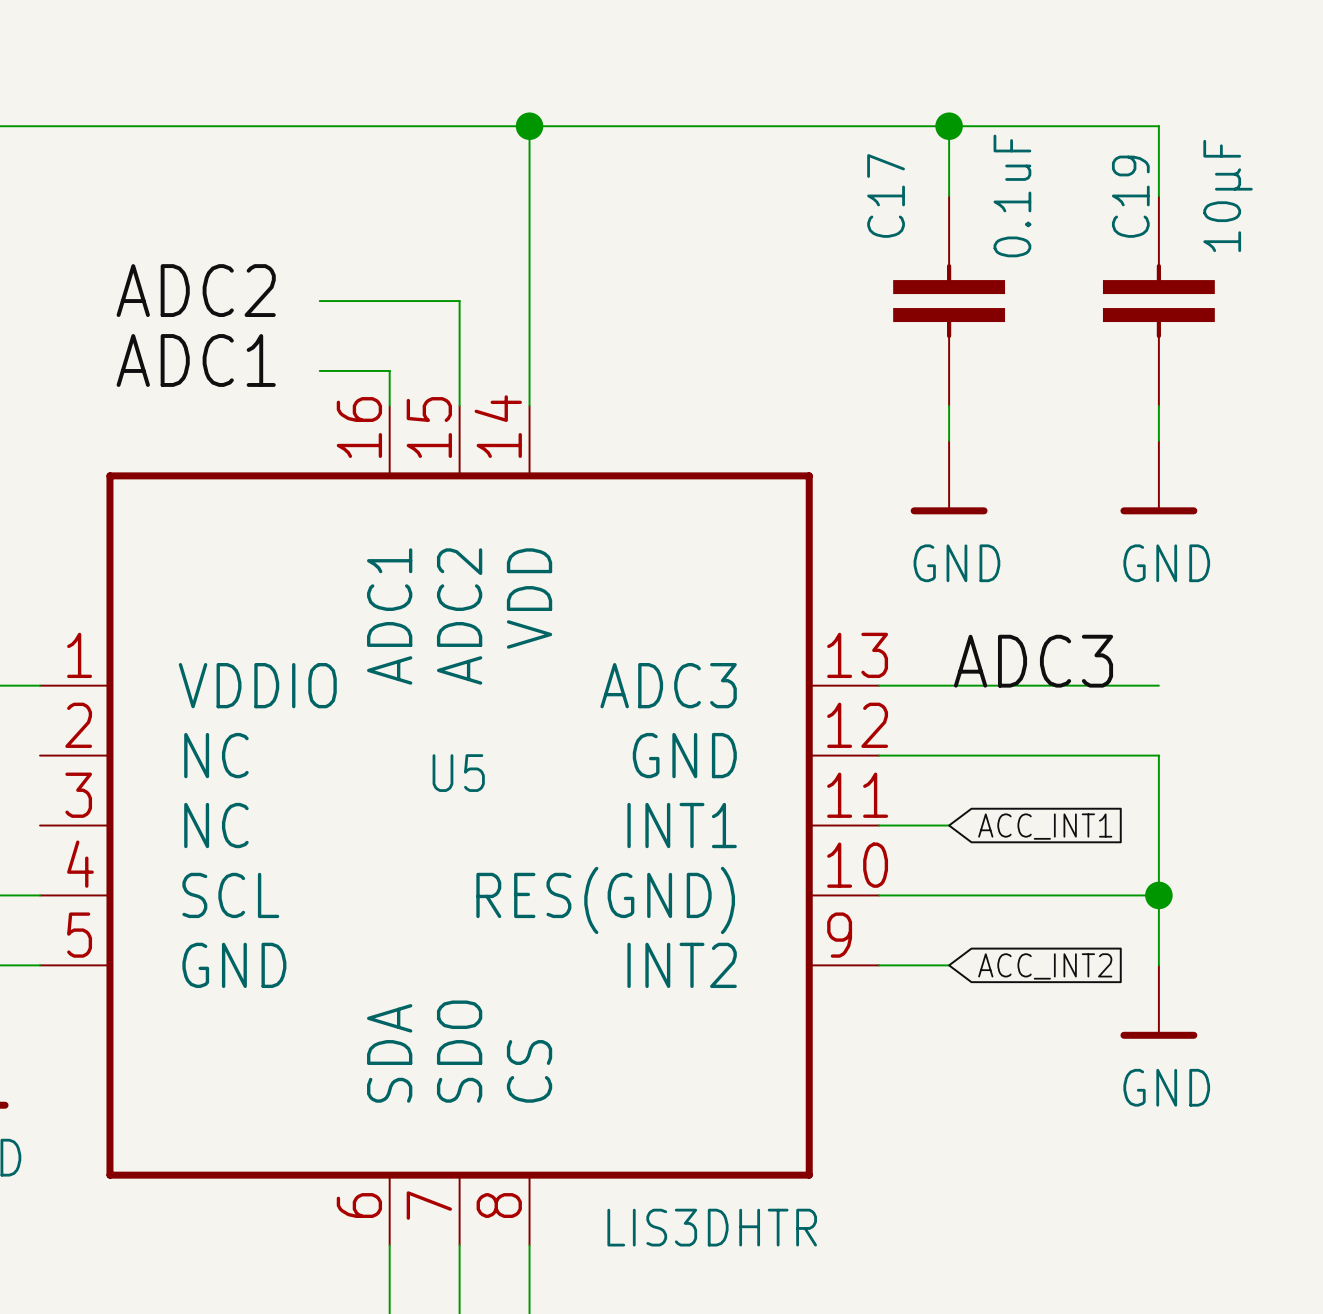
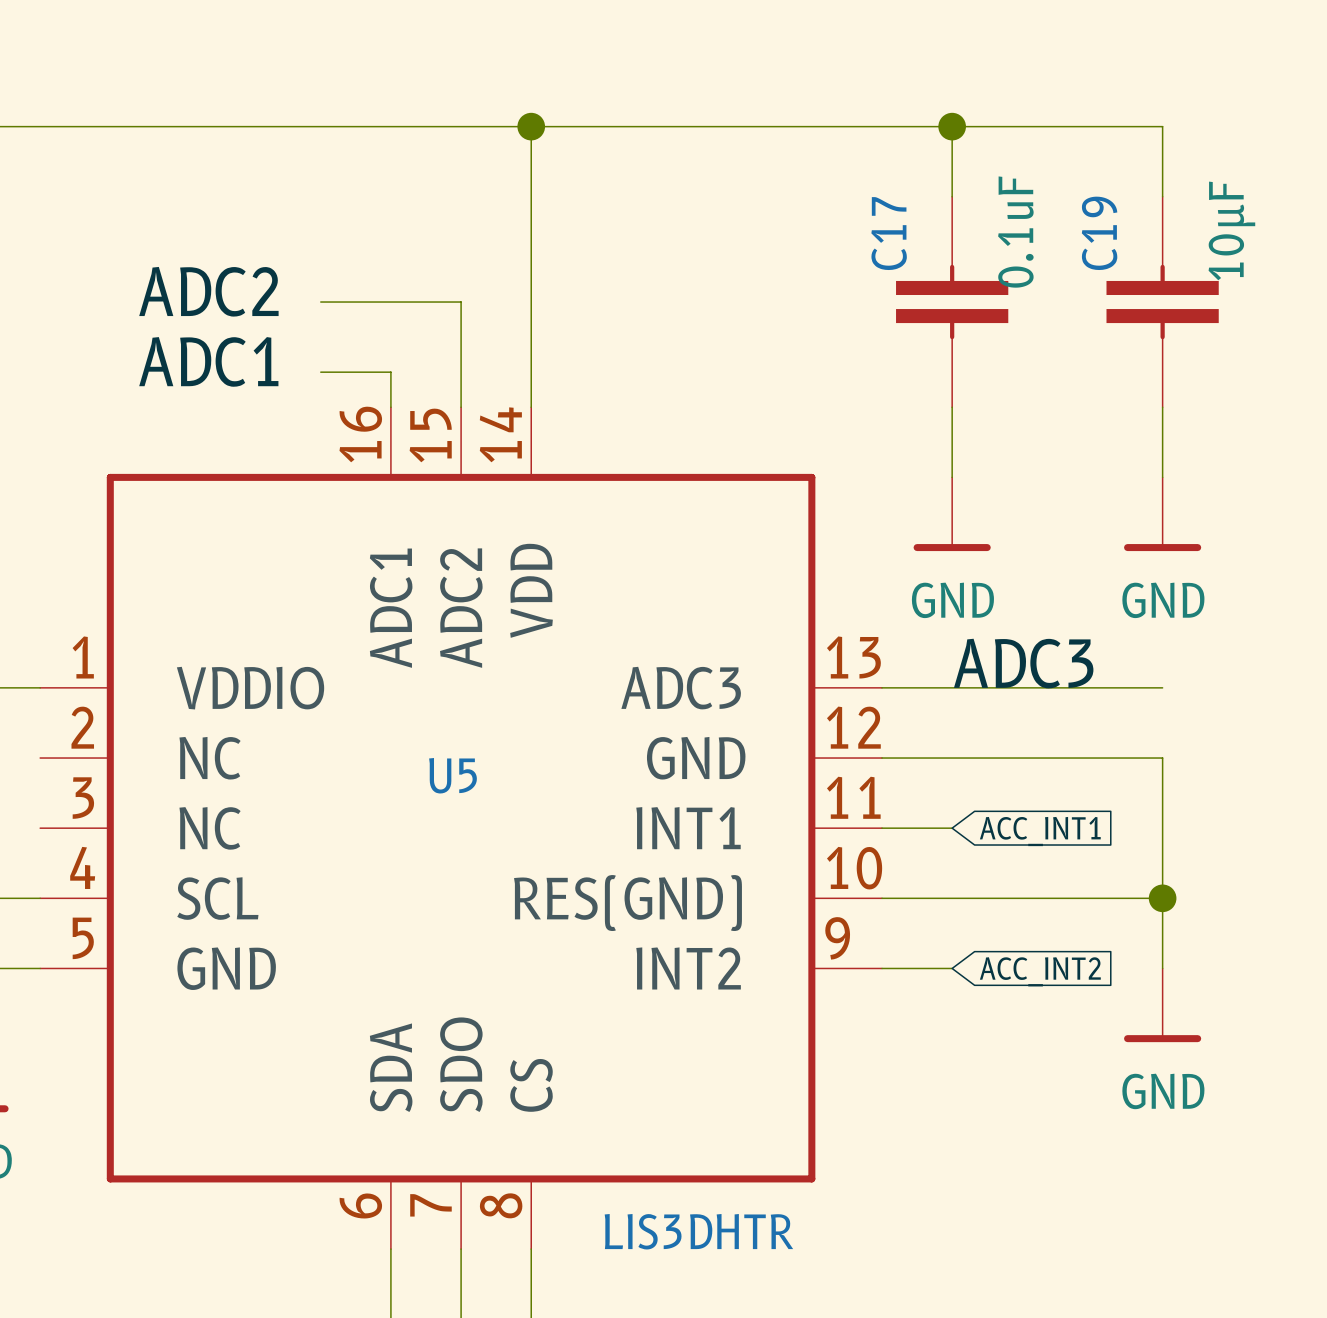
C17 name position: C17 (886, 195) -> C17 (889, 233)
C17 value position: 0.1uF (1012, 195) -> 0.1uF (1015, 232)
C19 value position: 10µF (1228, 195) -> 10µF (1231, 230)
C19 name position: C19 (1130, 196) -> C19 (1099, 233)
power symbol position: GND (949, 477) -> GND (952, 514)
power symbol position: GND (1158, 477) -> GND (1162, 514)

